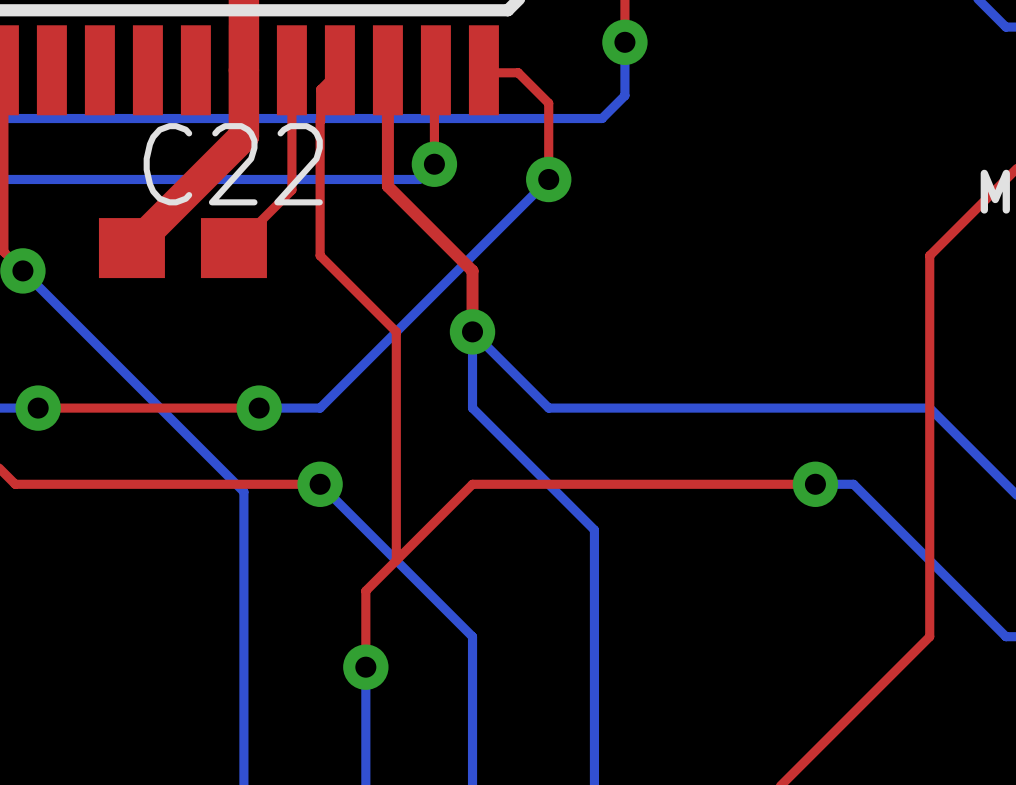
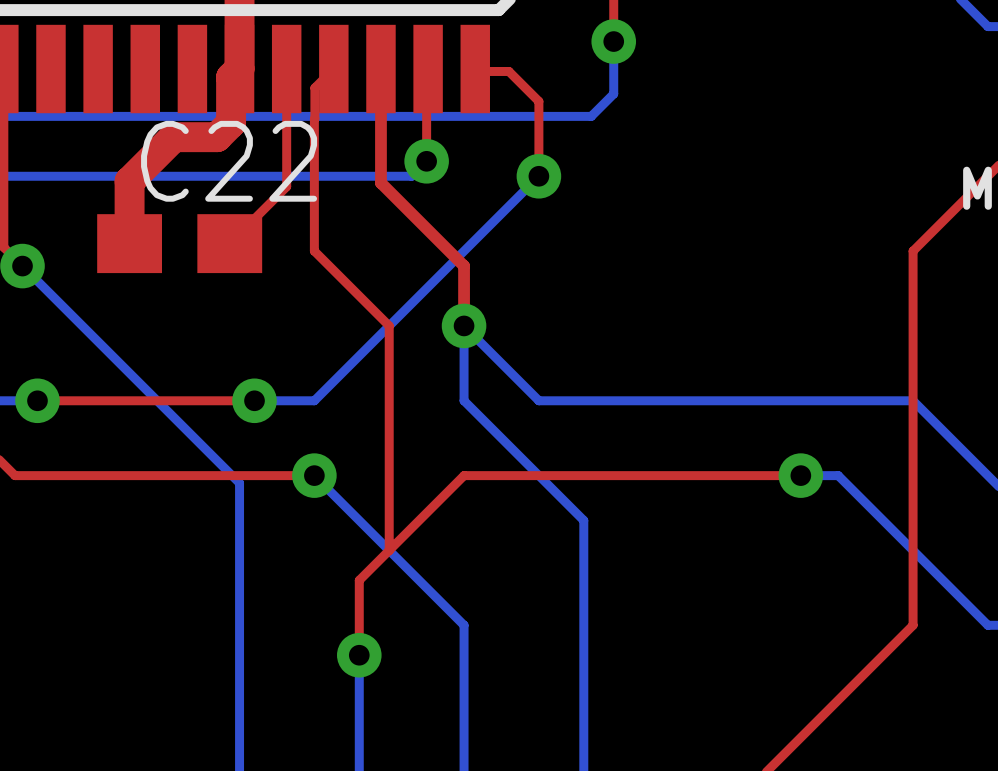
top track: (243, 70) (243, 136) (131, 248) -> (239, 69) (231, 77) (231, 123) (217, 137) (173, 137) (129, 181) (129, 243)

